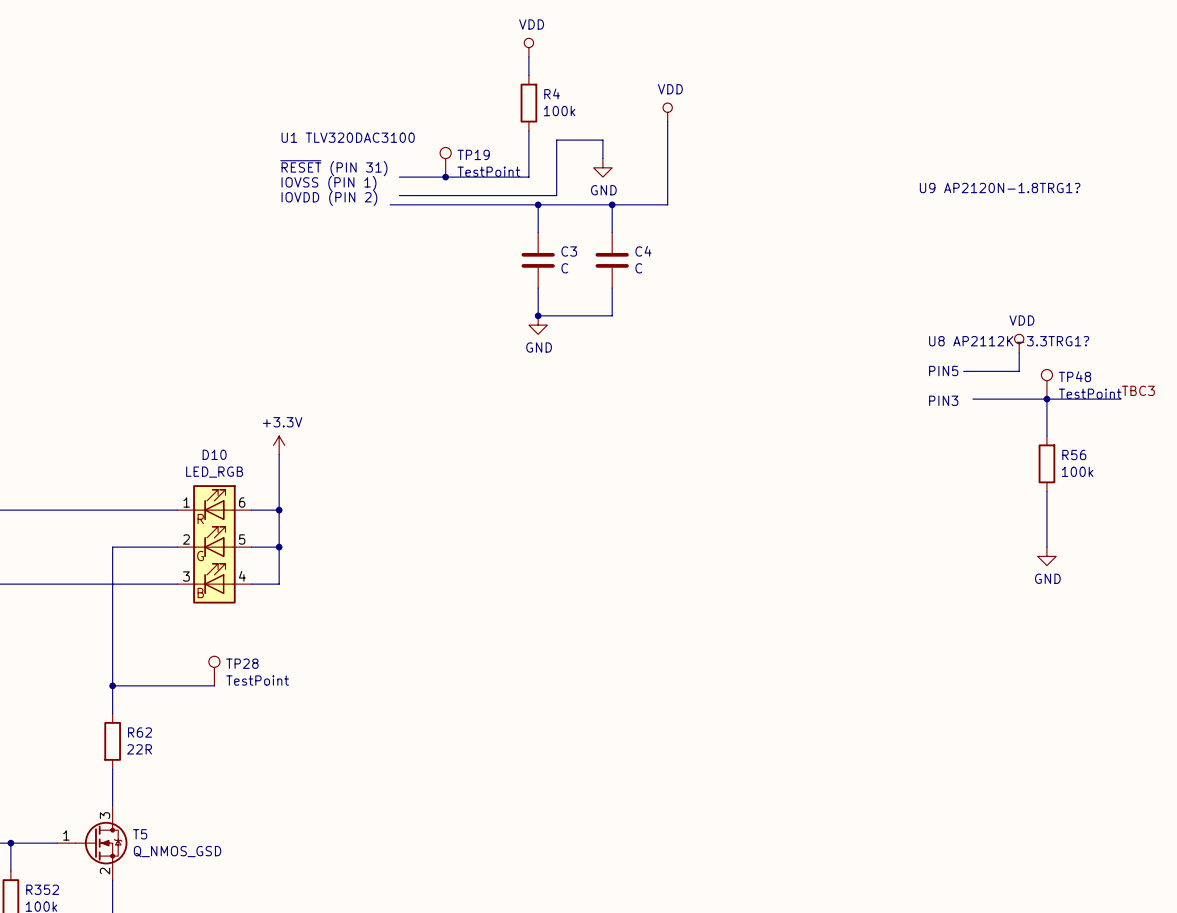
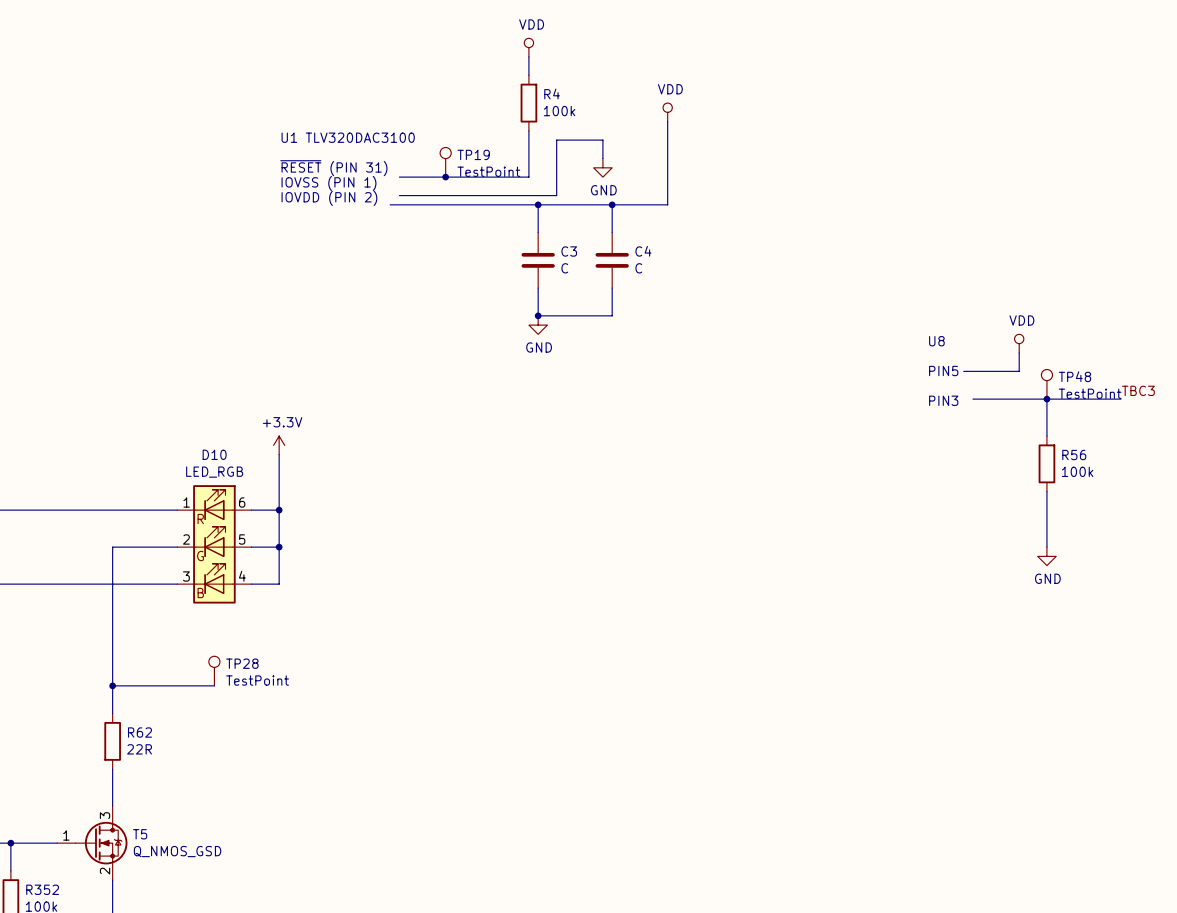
text: U9 AP2120N-1.8TRG1? (1000, 188) -> none
text: U8 AP2112K-3.3TRG1? (1009, 341) -> U8 (936, 341)

